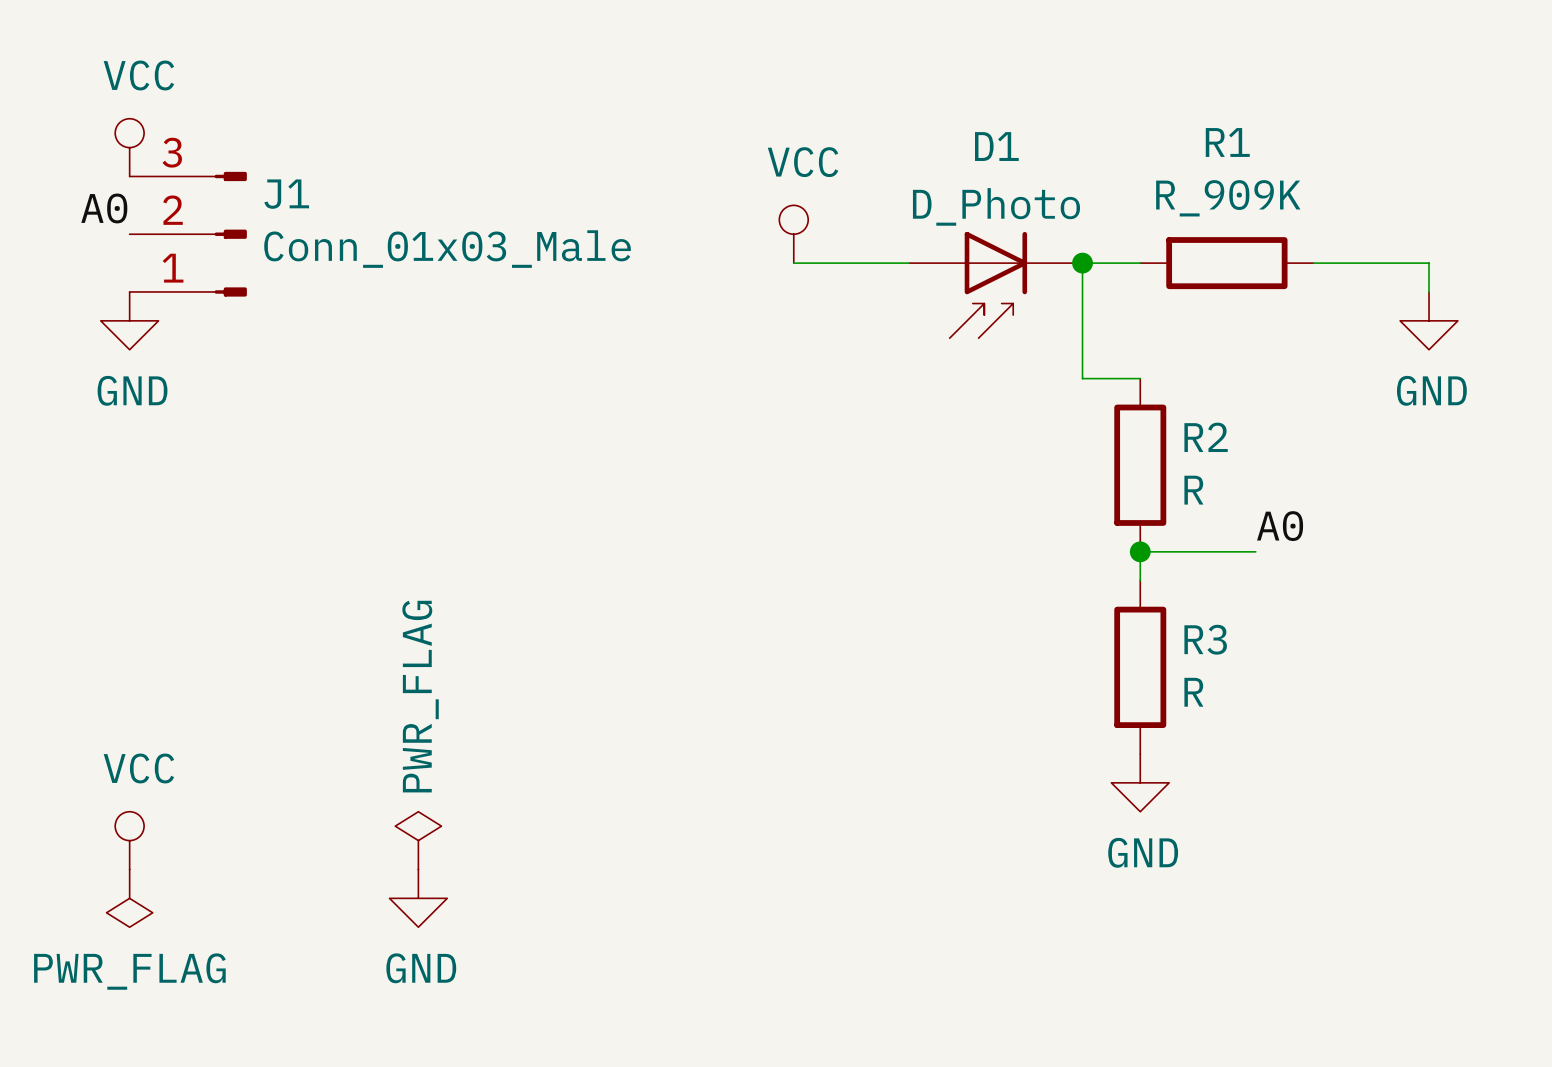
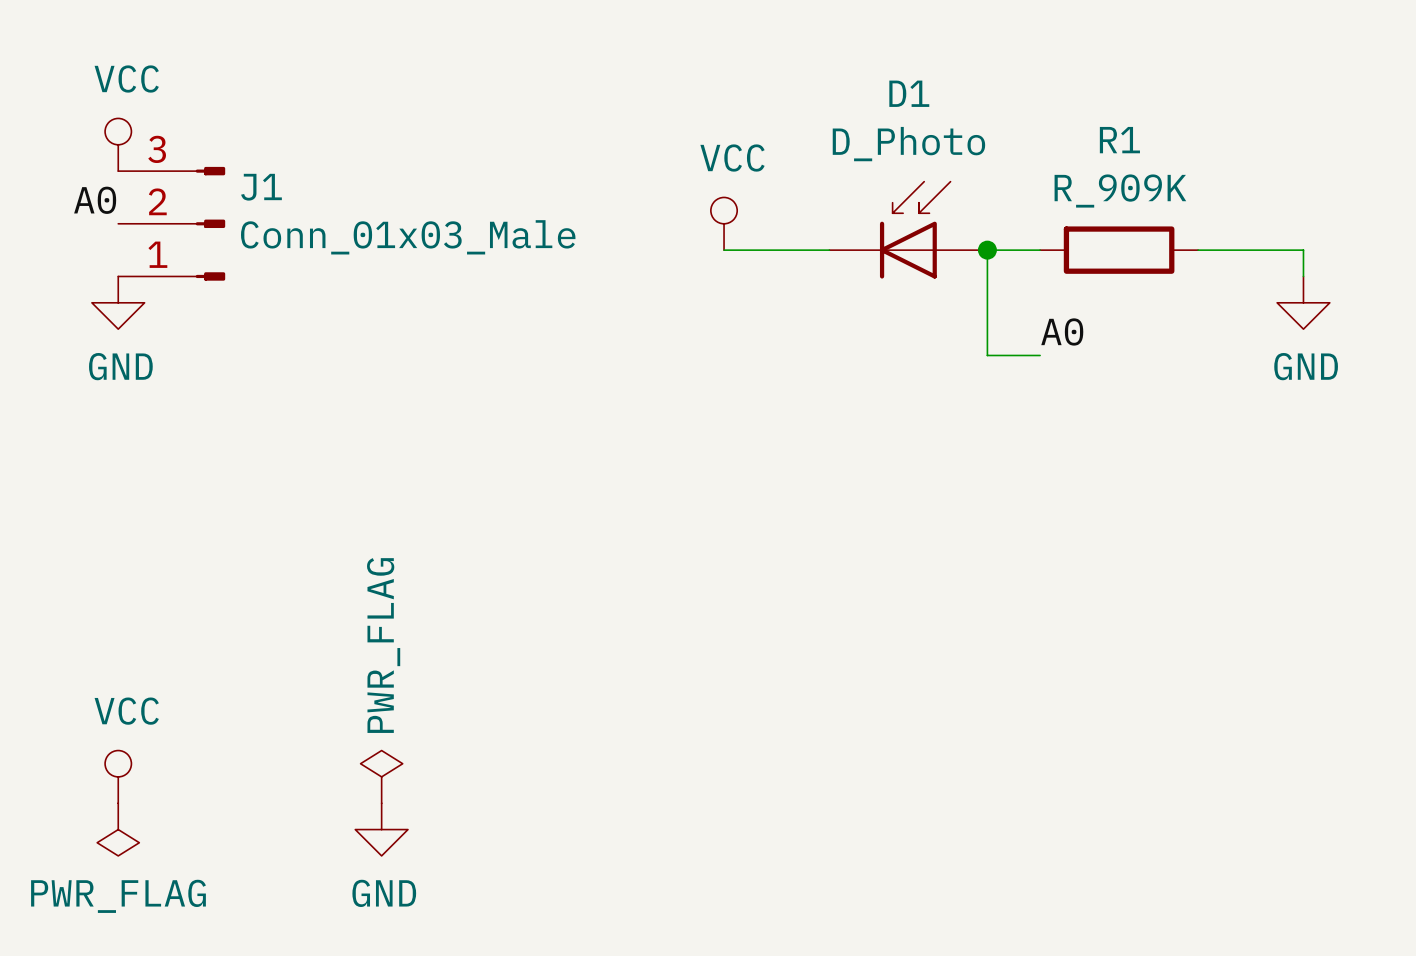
D1 rotation: 0° (988, 285) -> 180° (915, 230)
R2: R (1140, 465) -> none
label position: A0 (1280, 526) -> A0 (1062, 331)
junction: (1140, 551) -> none
wire: (1255, 551) (1140, 551) (1140, 580) -> none
R3: R (1140, 667) -> none
power symbol: GND (1140, 782) -> none

